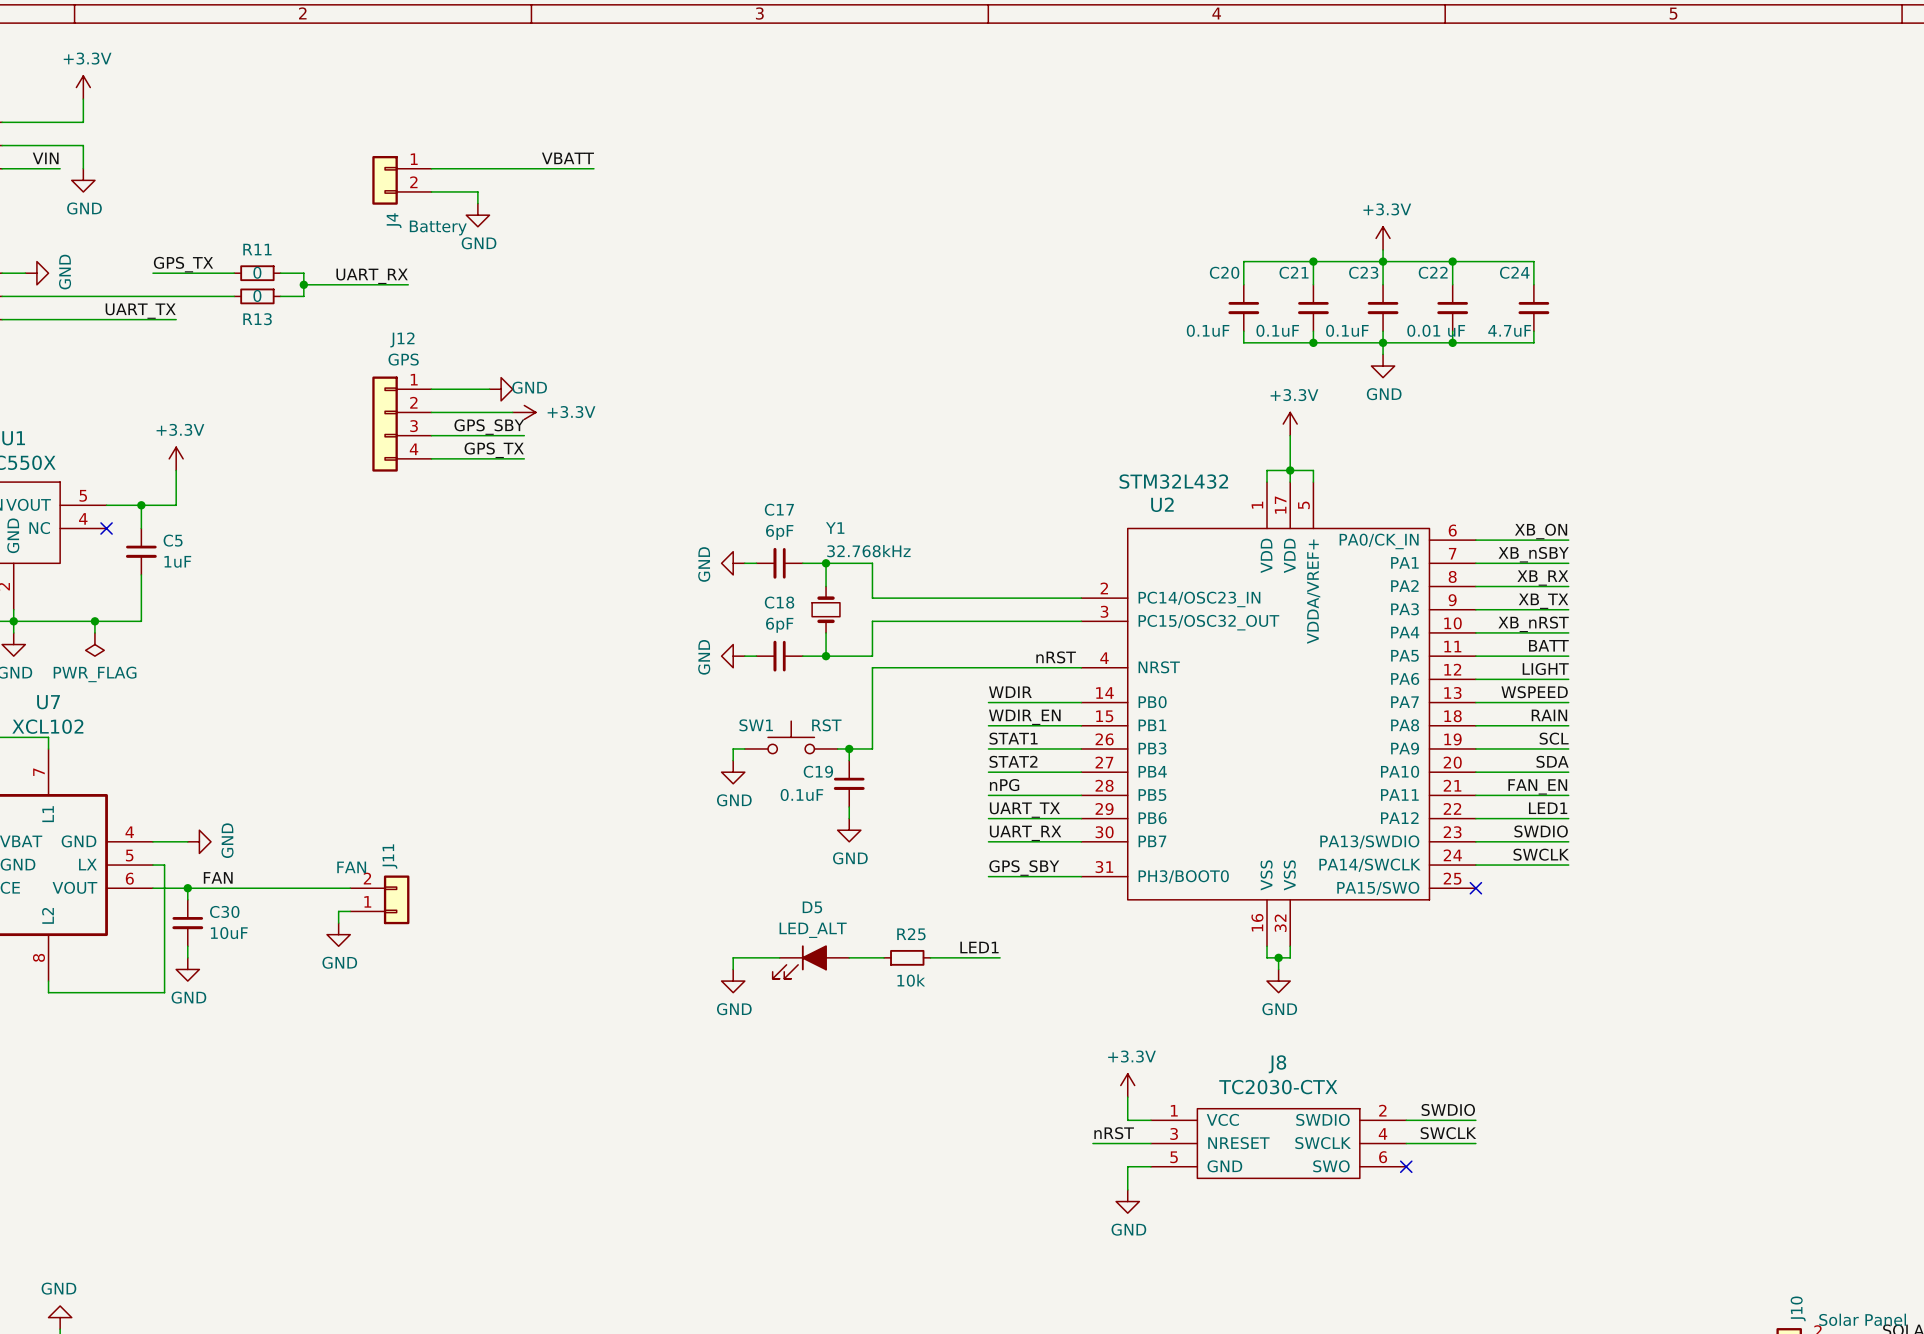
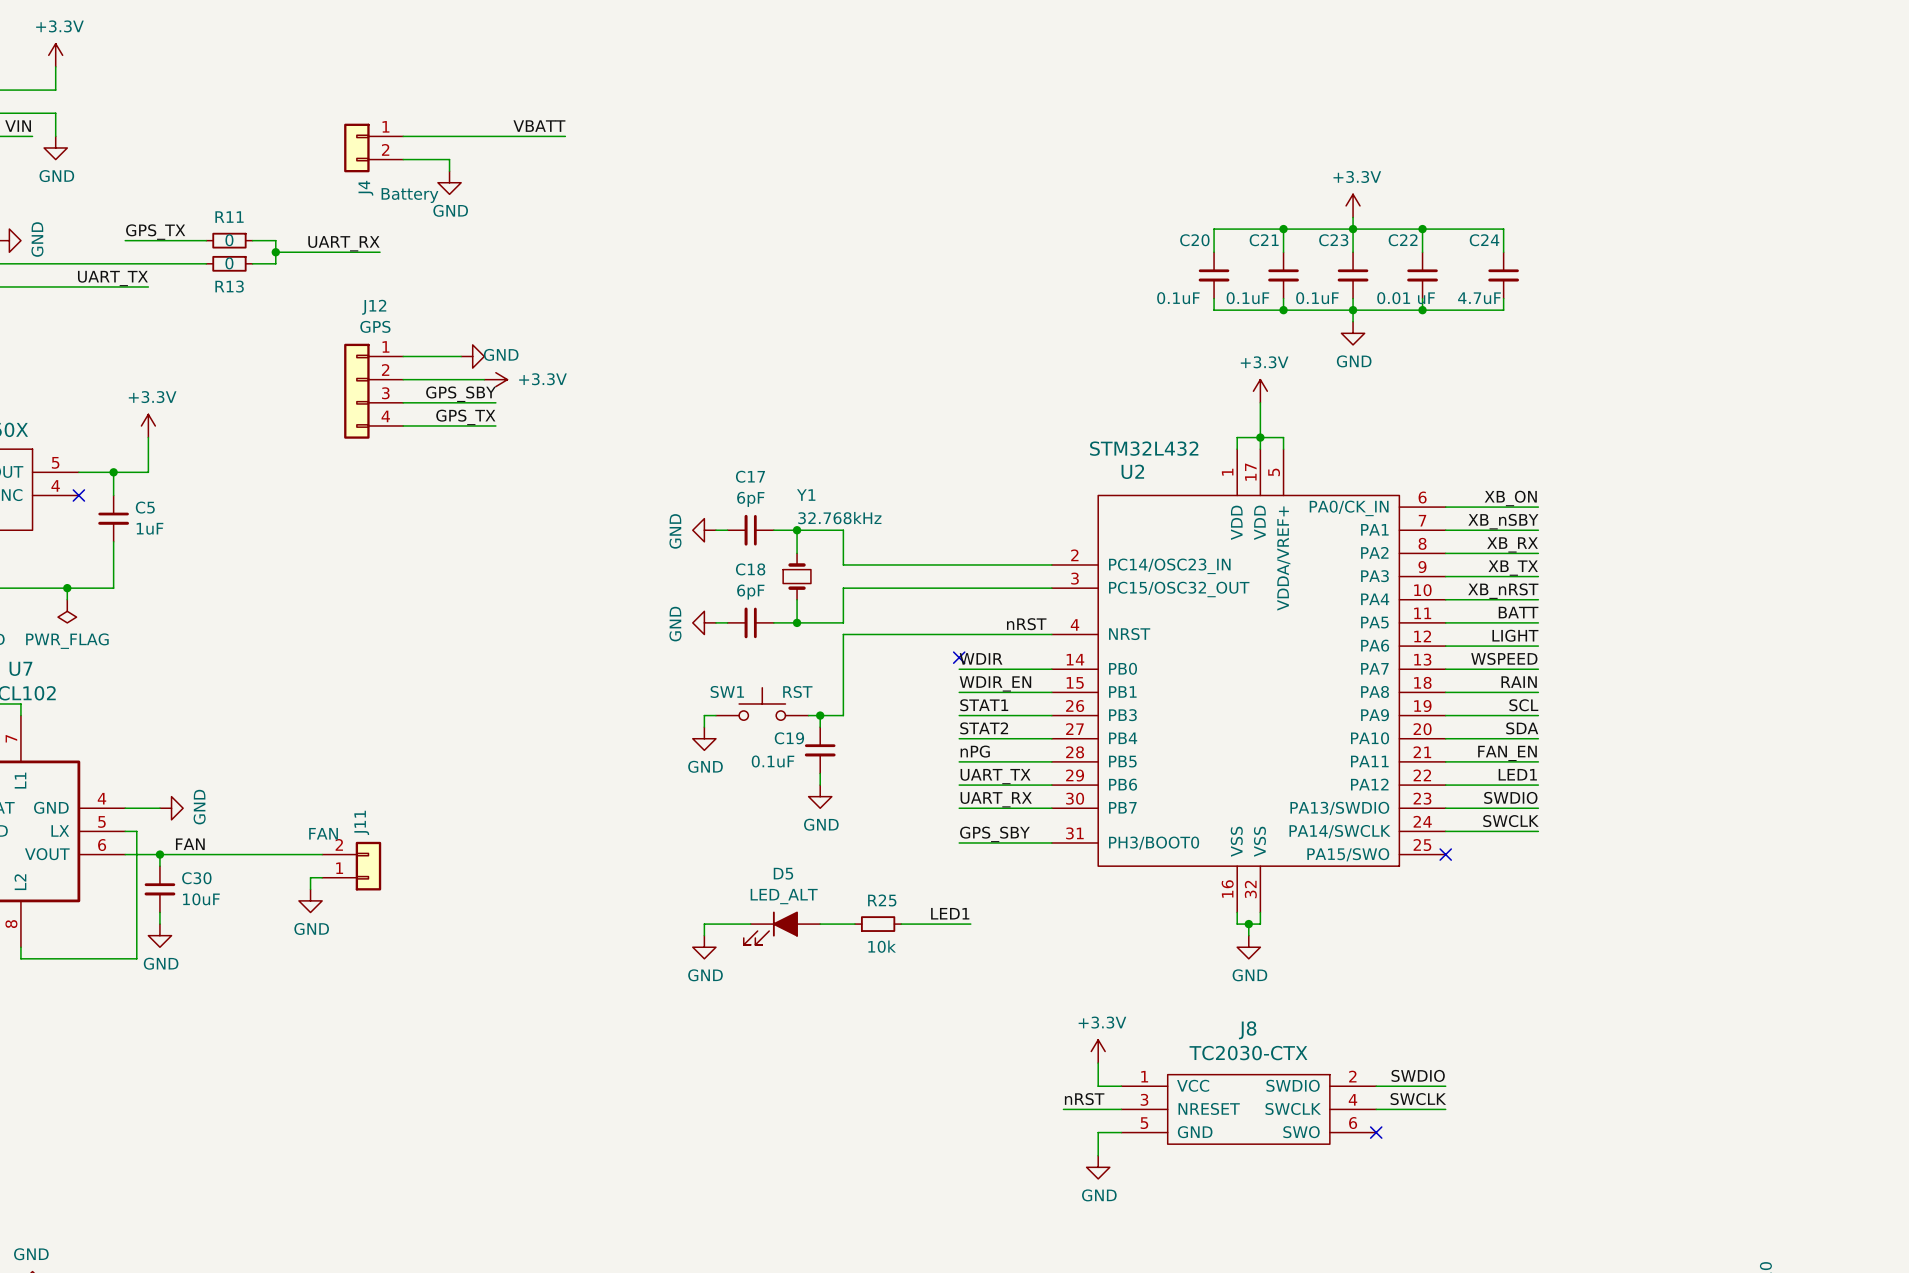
no-connect mark: none -> (959, 657)

